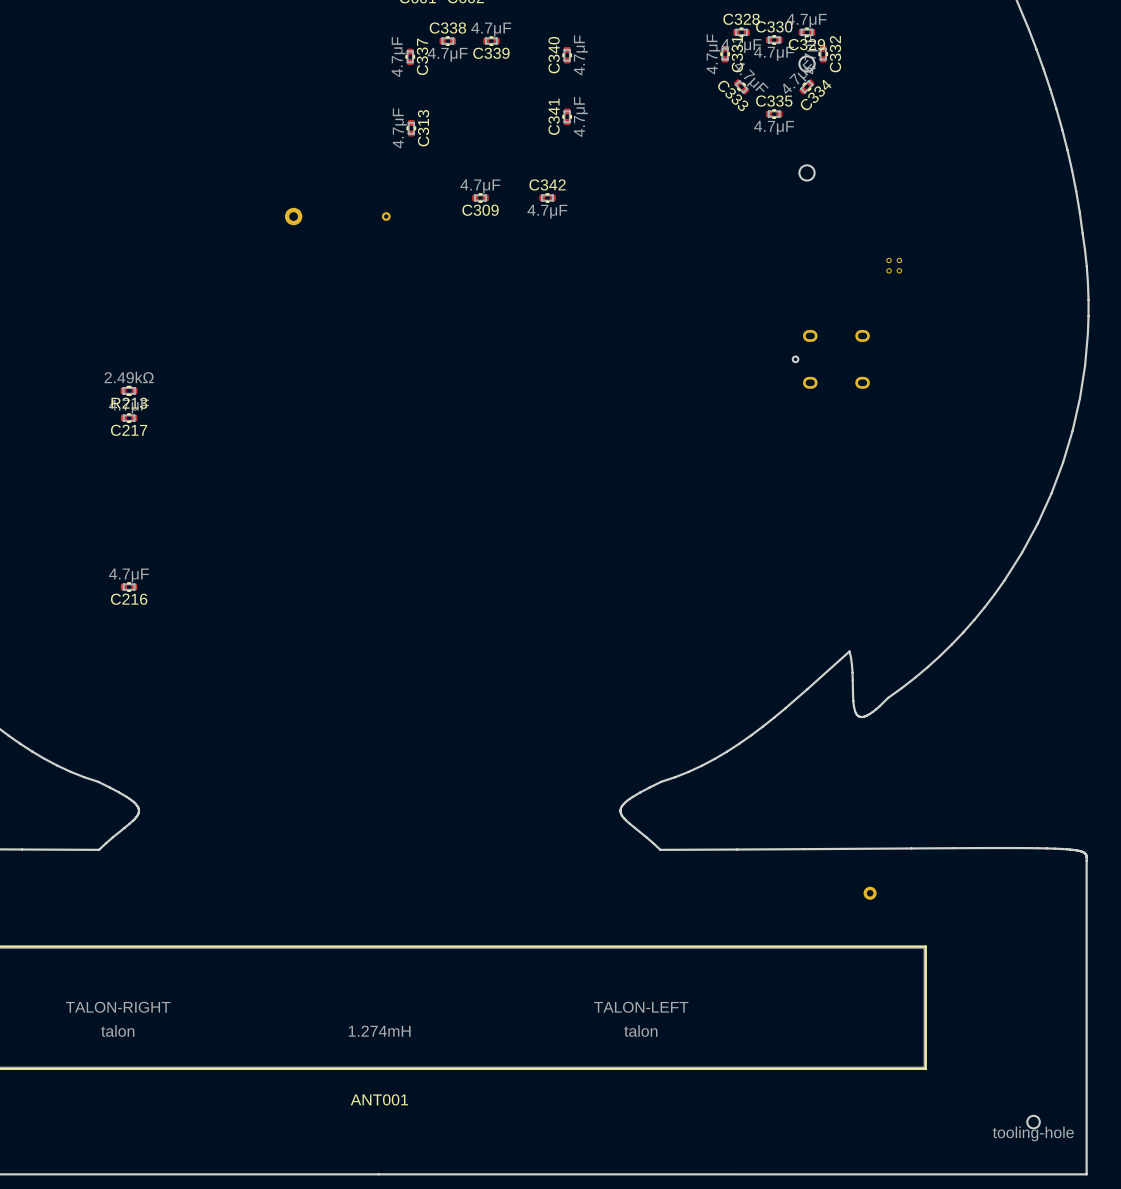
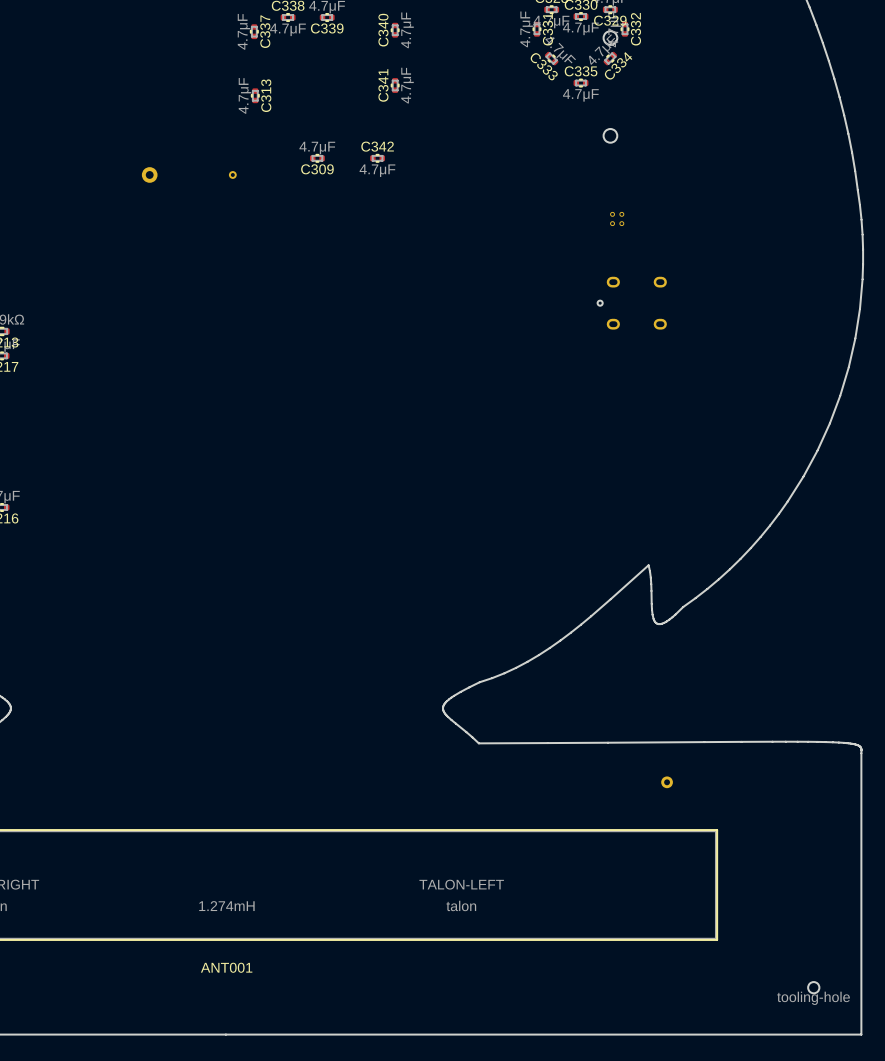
part position: (894, 265) -> (617, 218)

